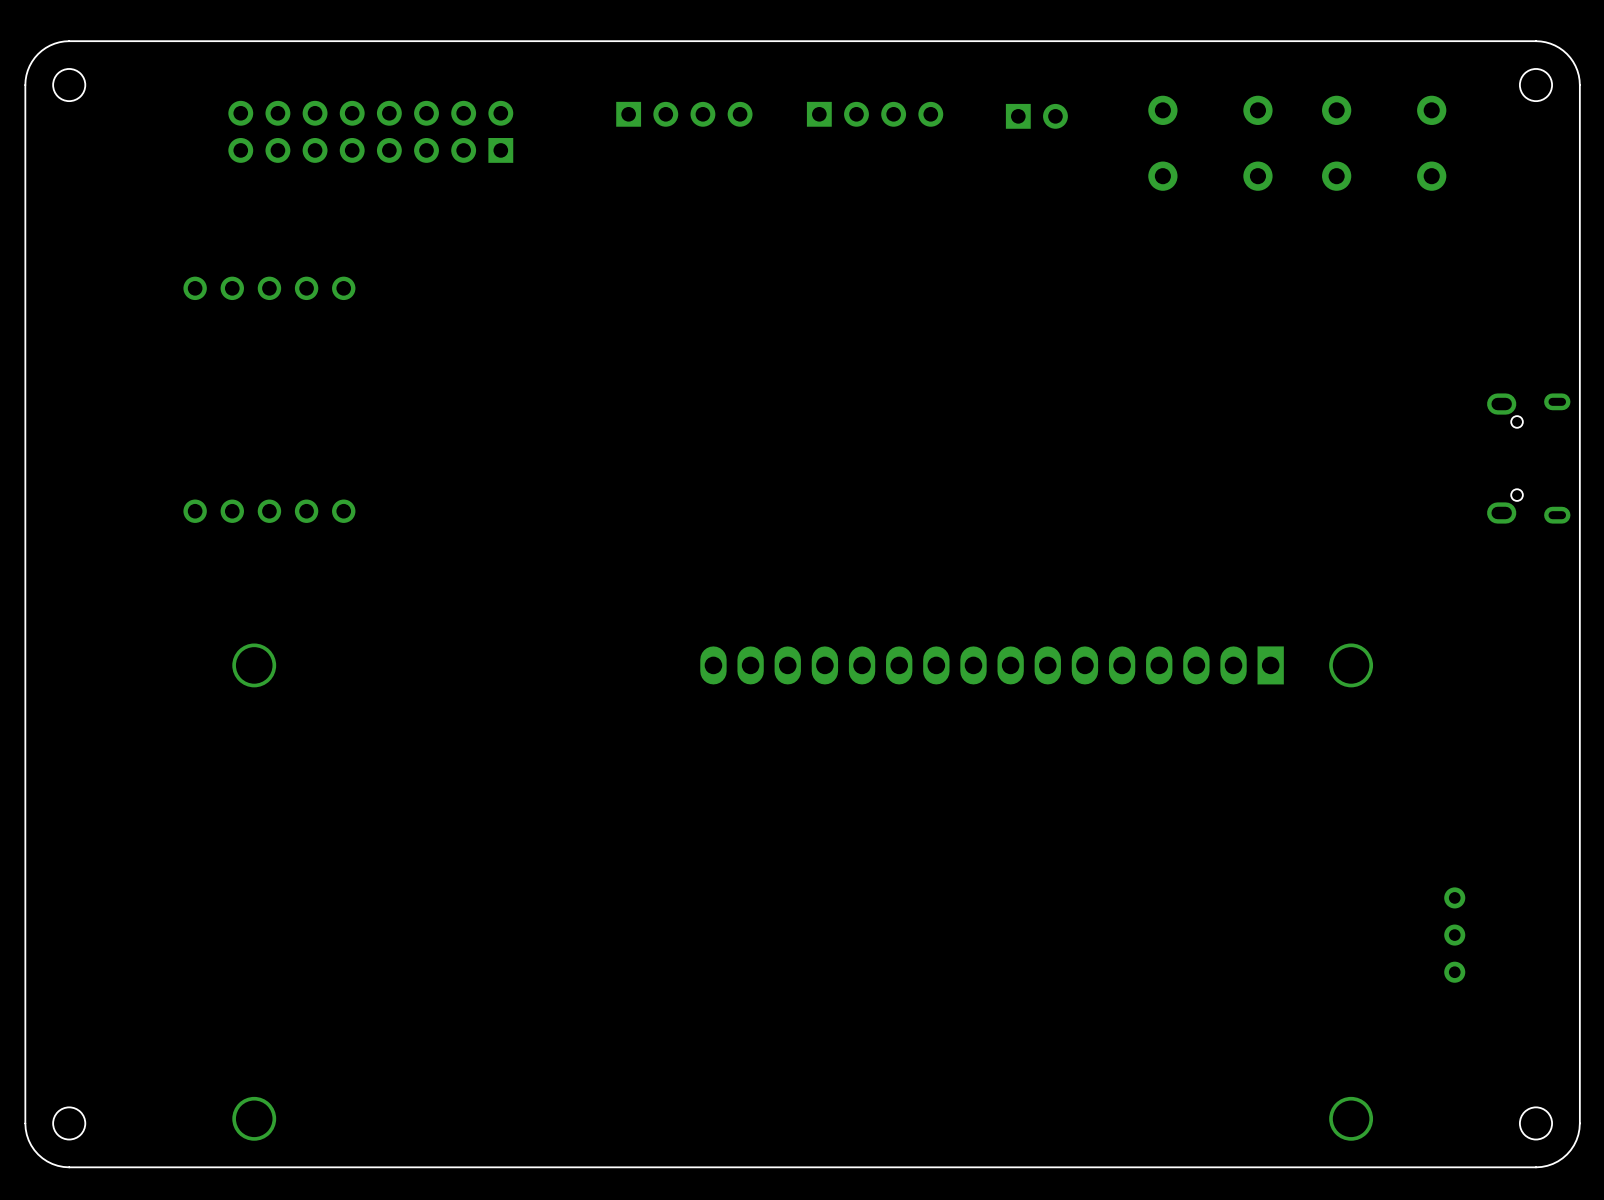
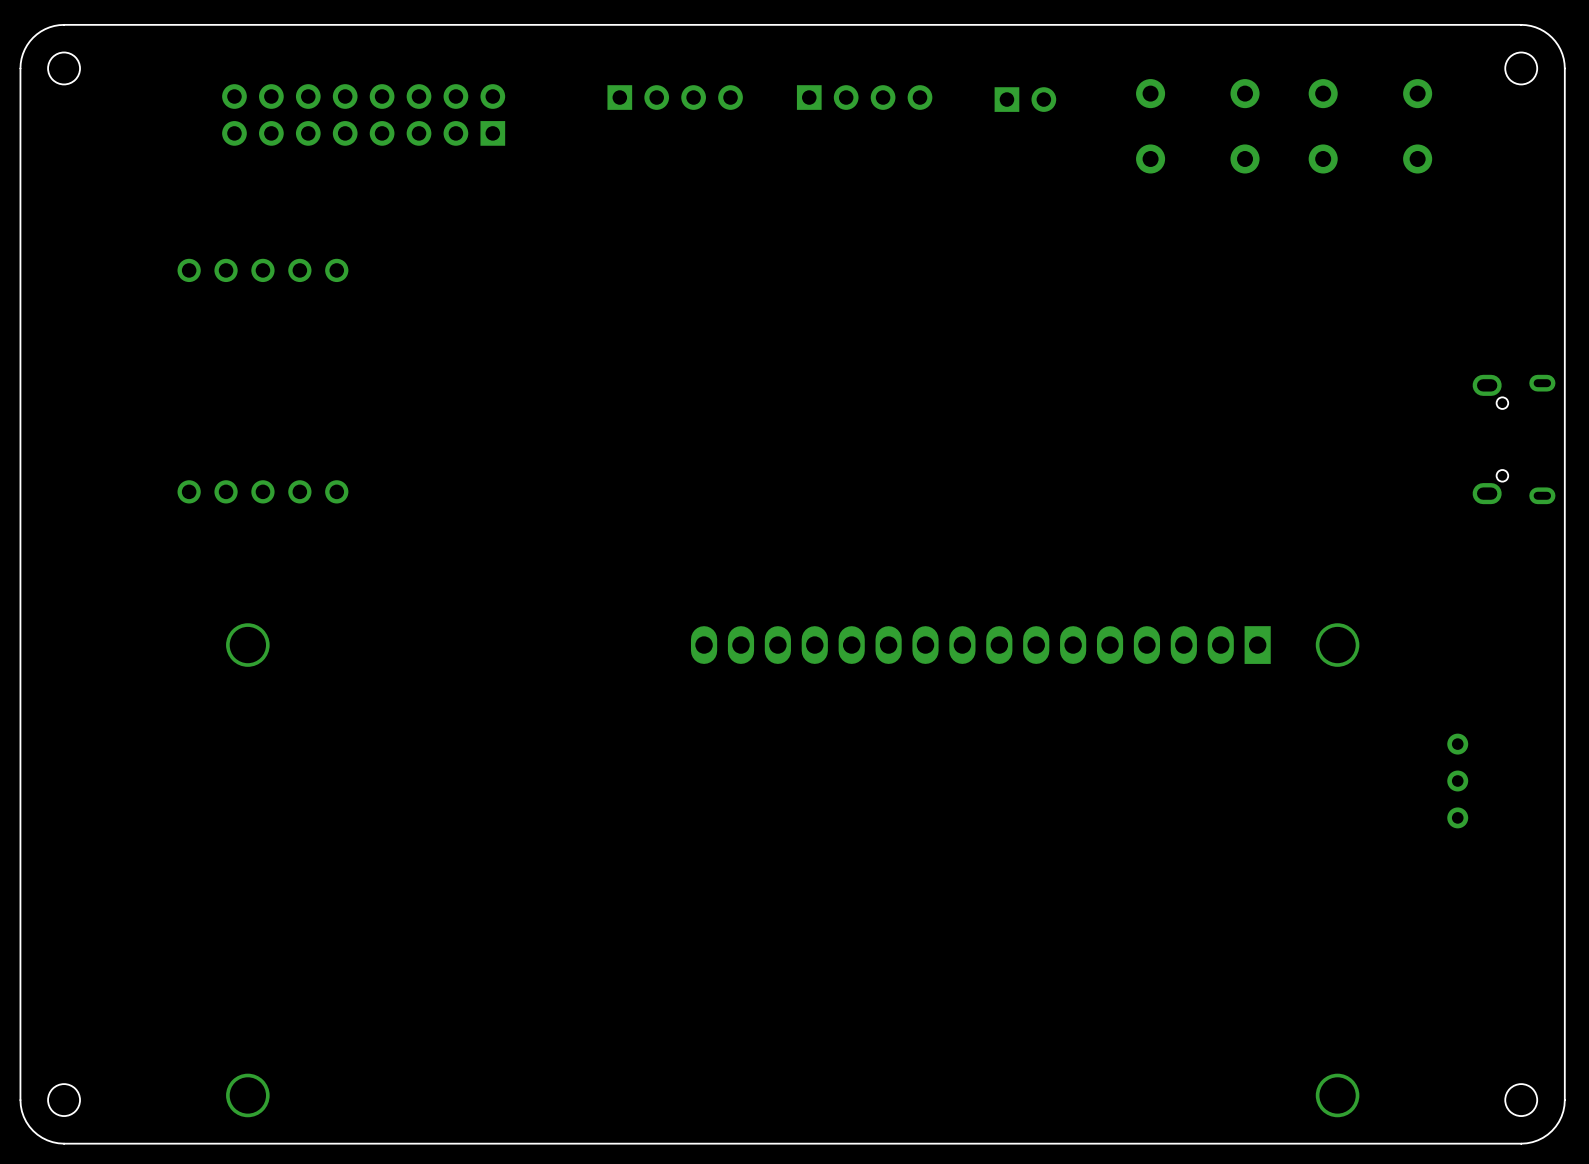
part position: (1454, 935) -> (1457, 781)

